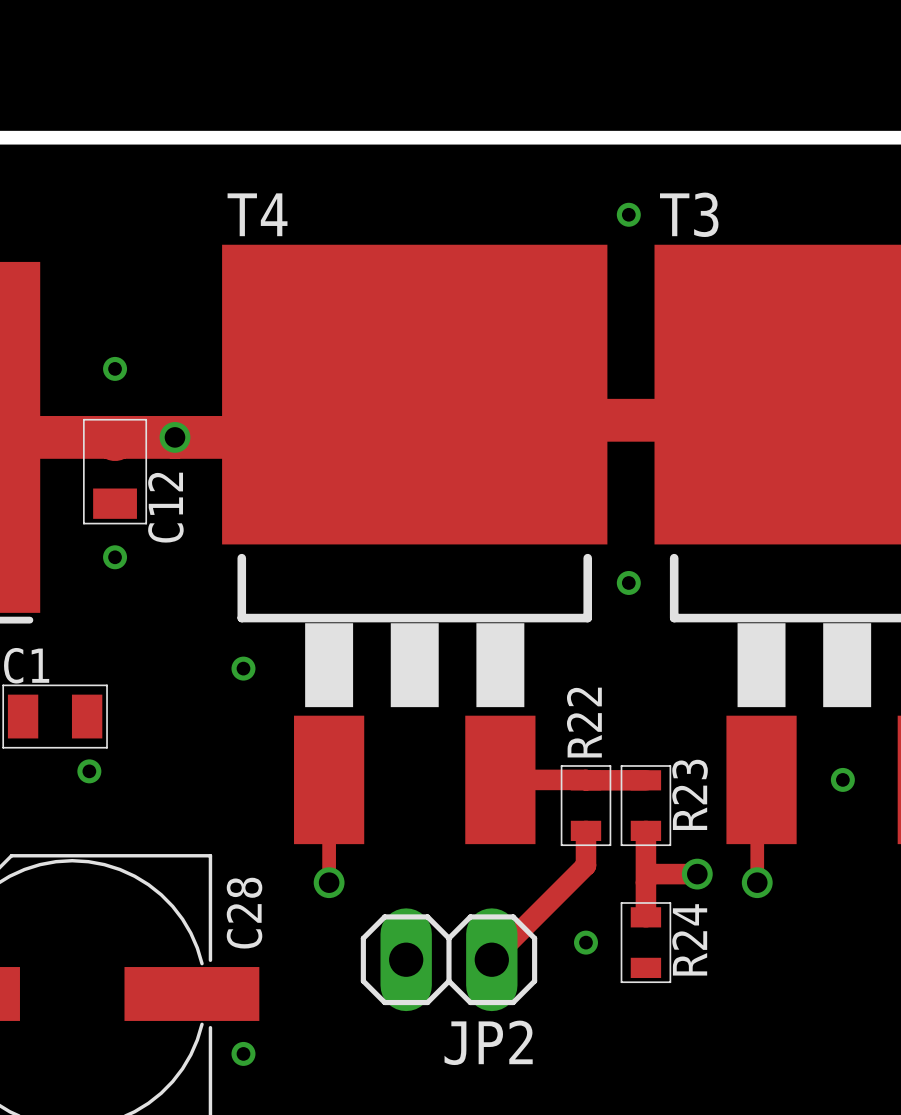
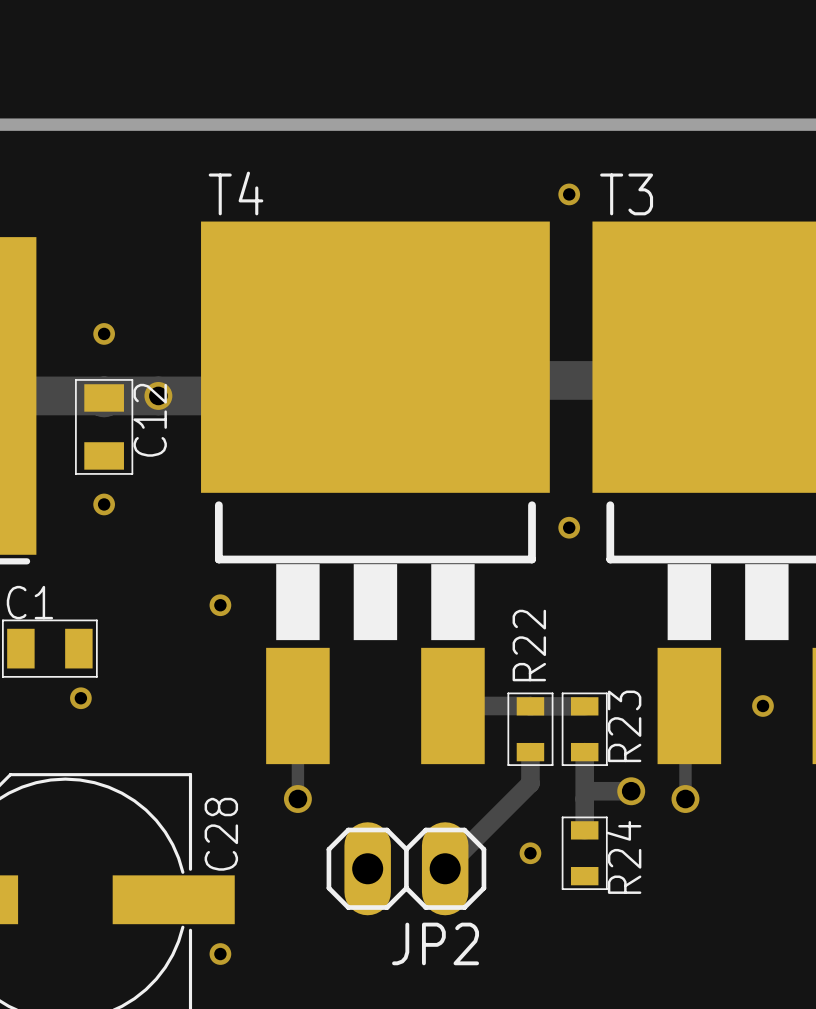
C12 name position: C12 (165, 507) -> C12 (150, 420)

